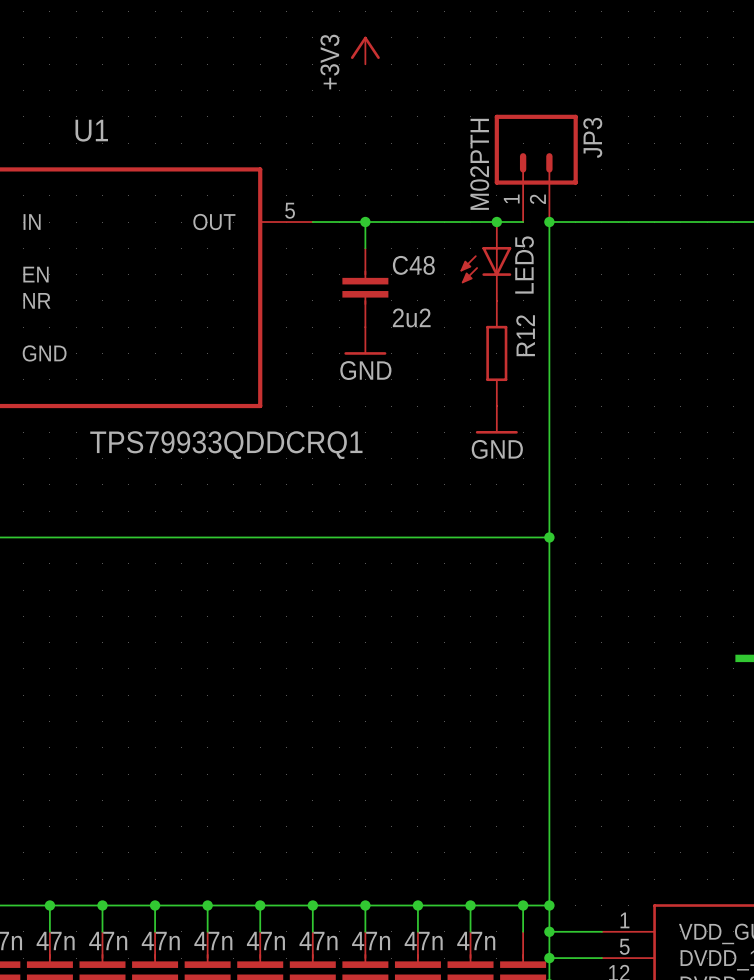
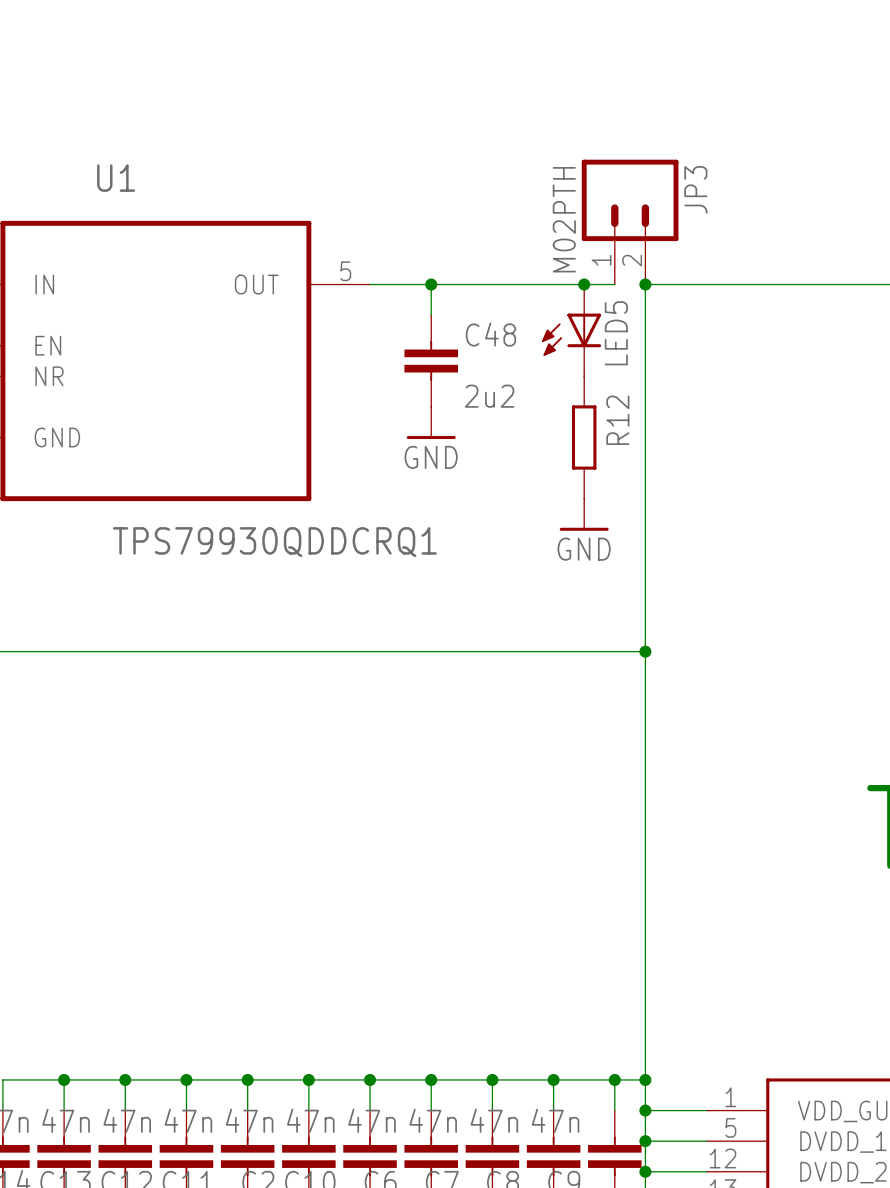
power symbol: +3V3 (365, 50) -> none
U1 value: TPS79933QDDCRQ1 (226, 445) -> TPS79930QDDCRQ1 (274, 542)

